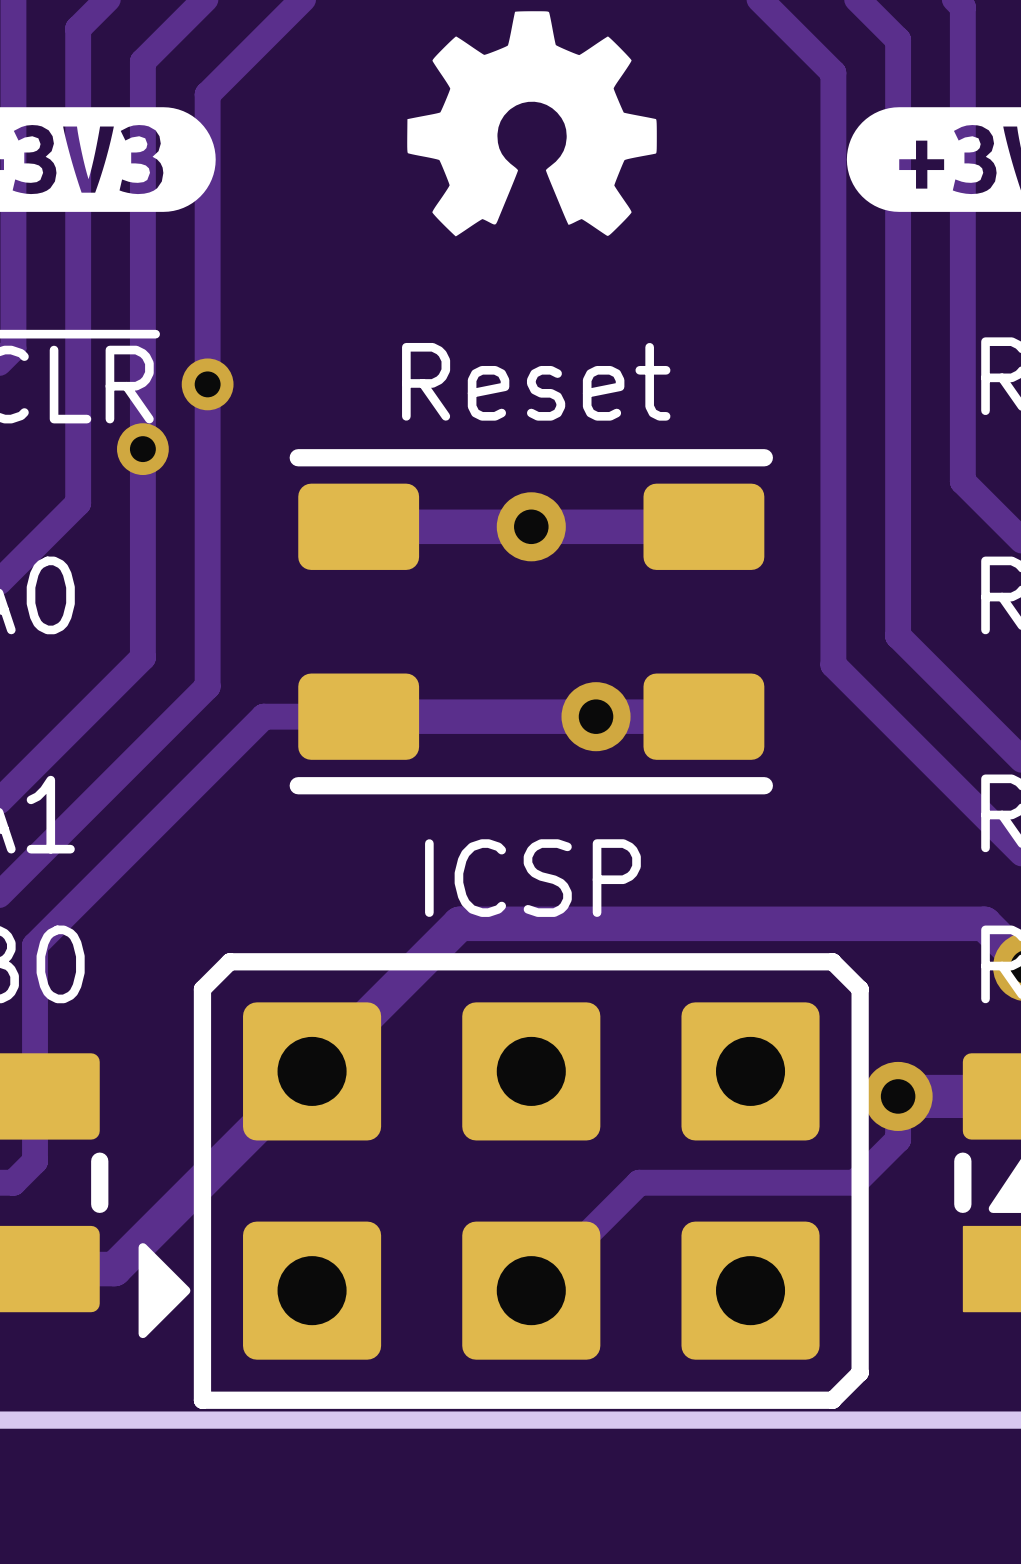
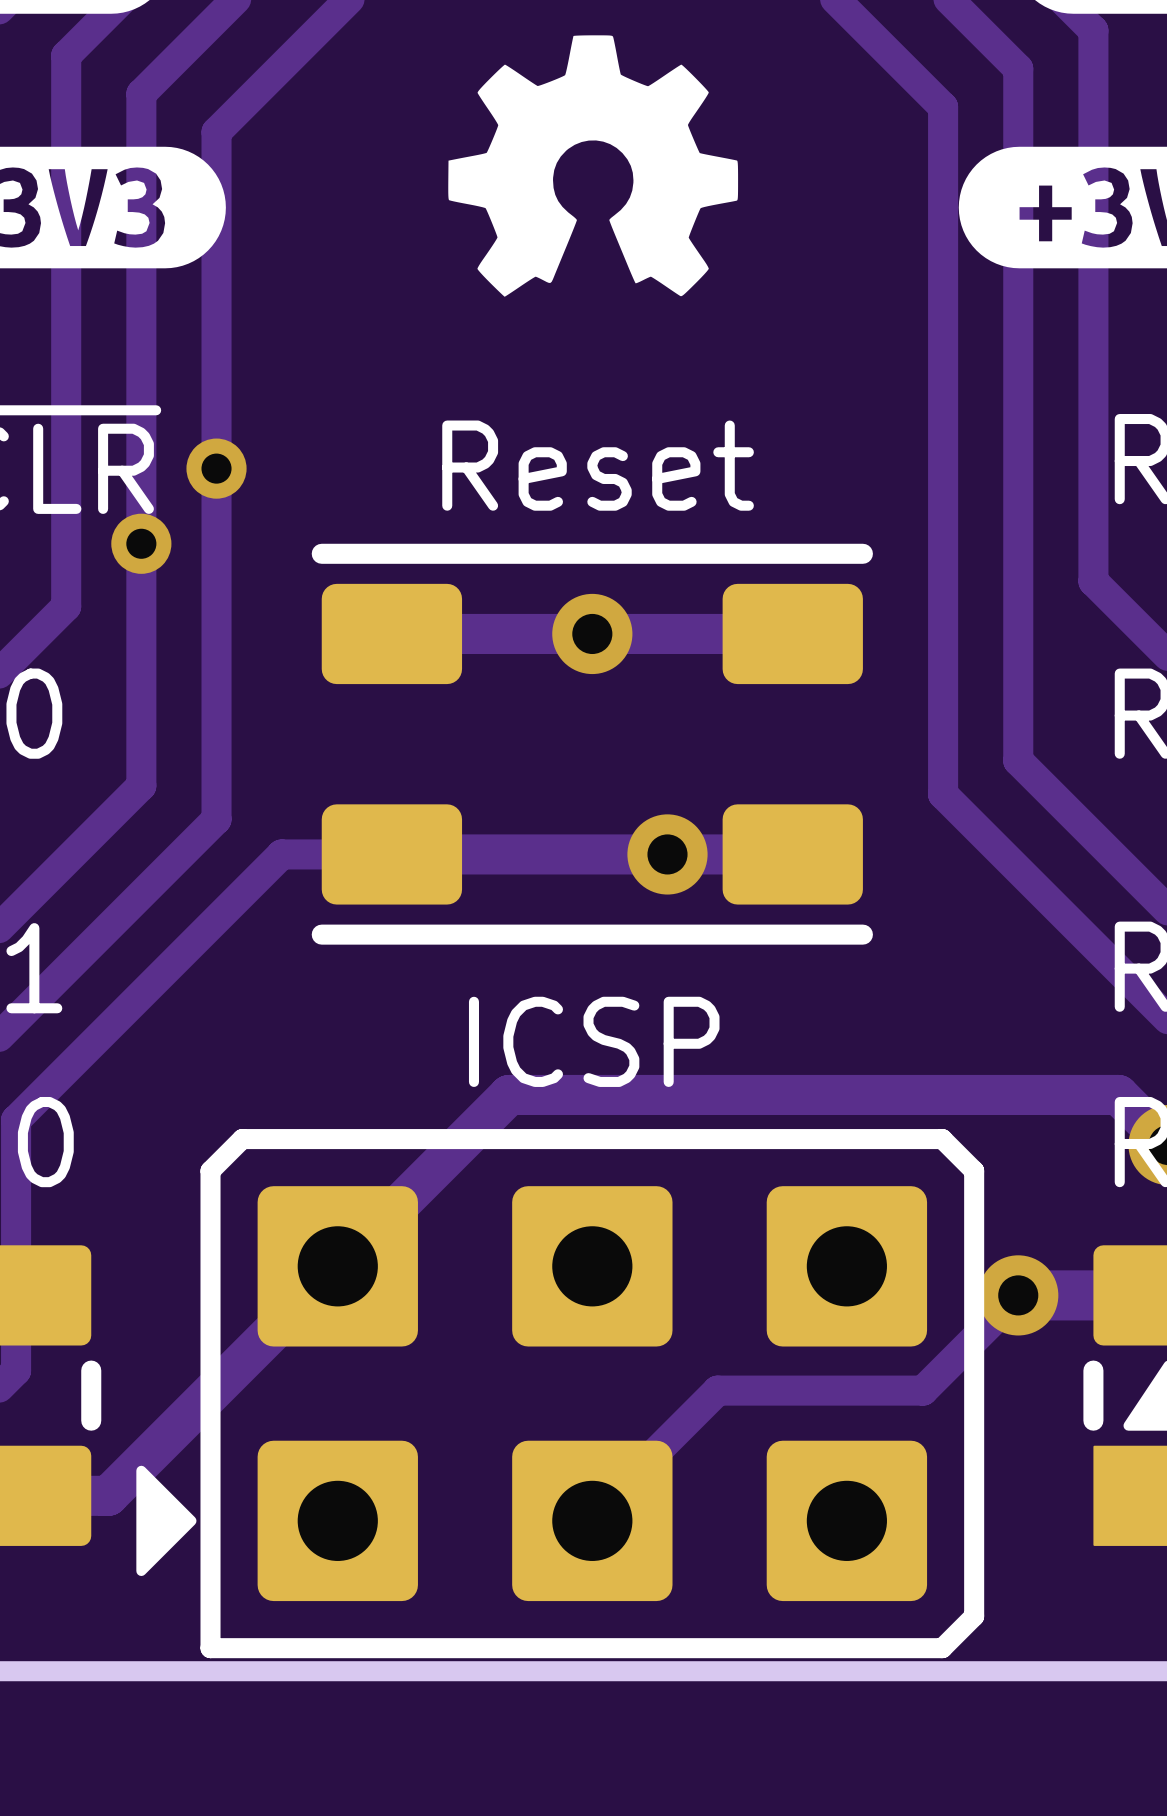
track: (898, 1096) (898, 1139) (854, 1182) (639, 1182) (531, 1290) -> (1018, 1295) (923, 1390) (717, 1390) (592, 1515)

